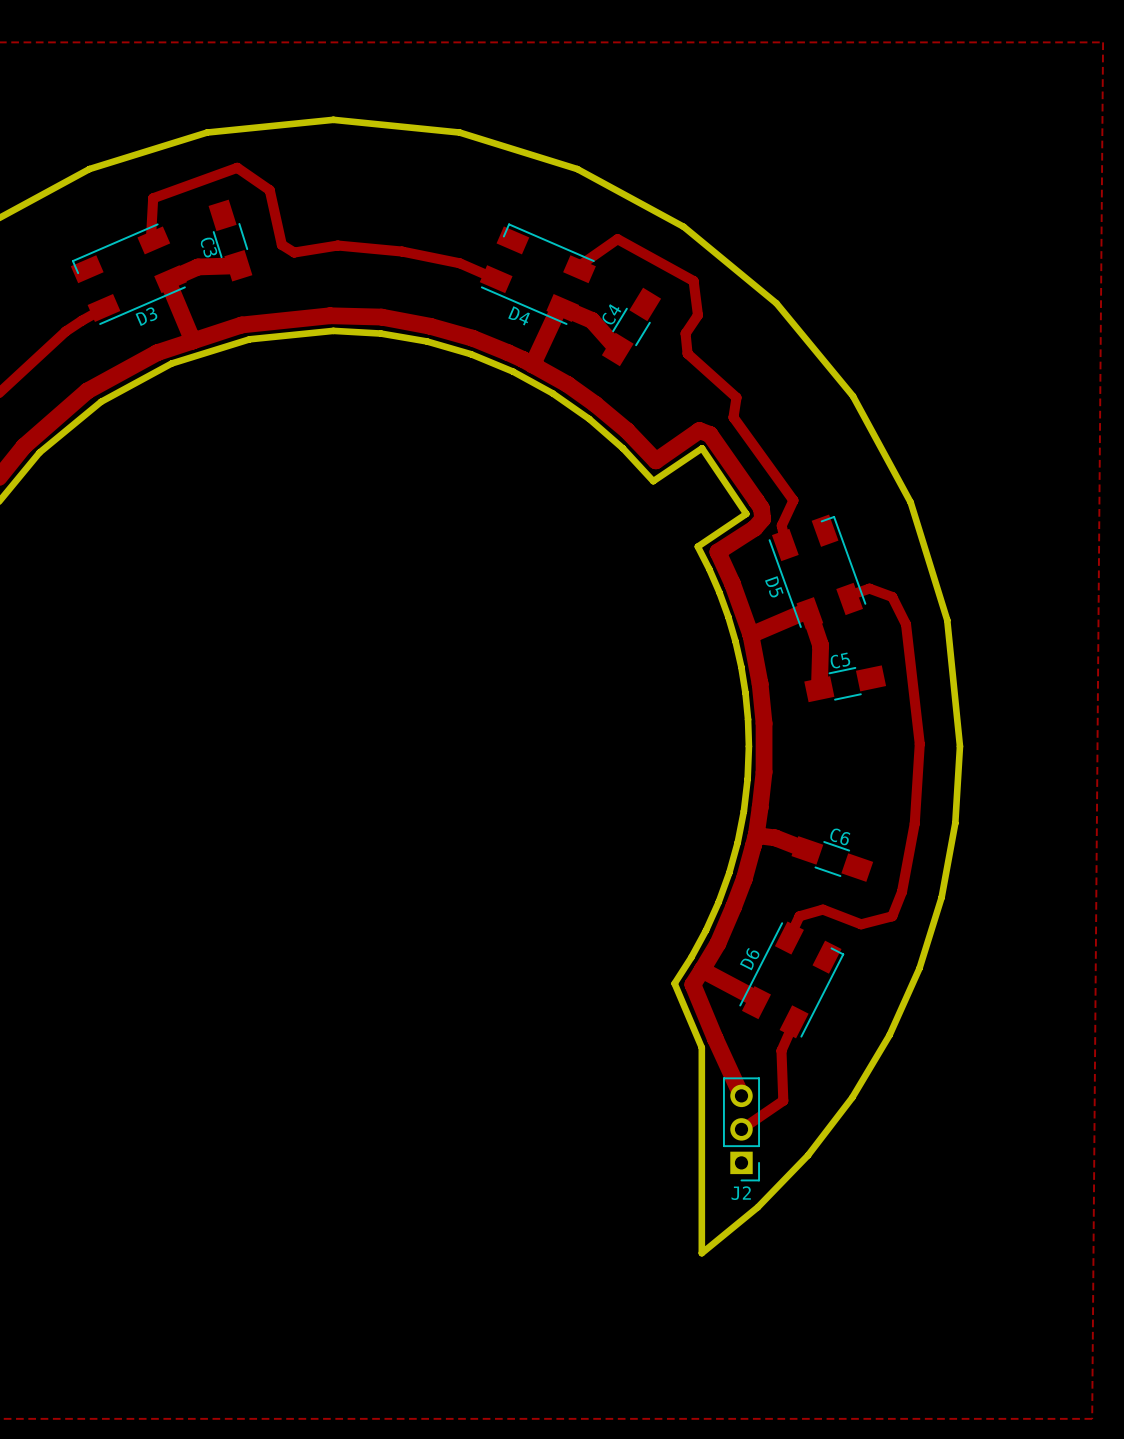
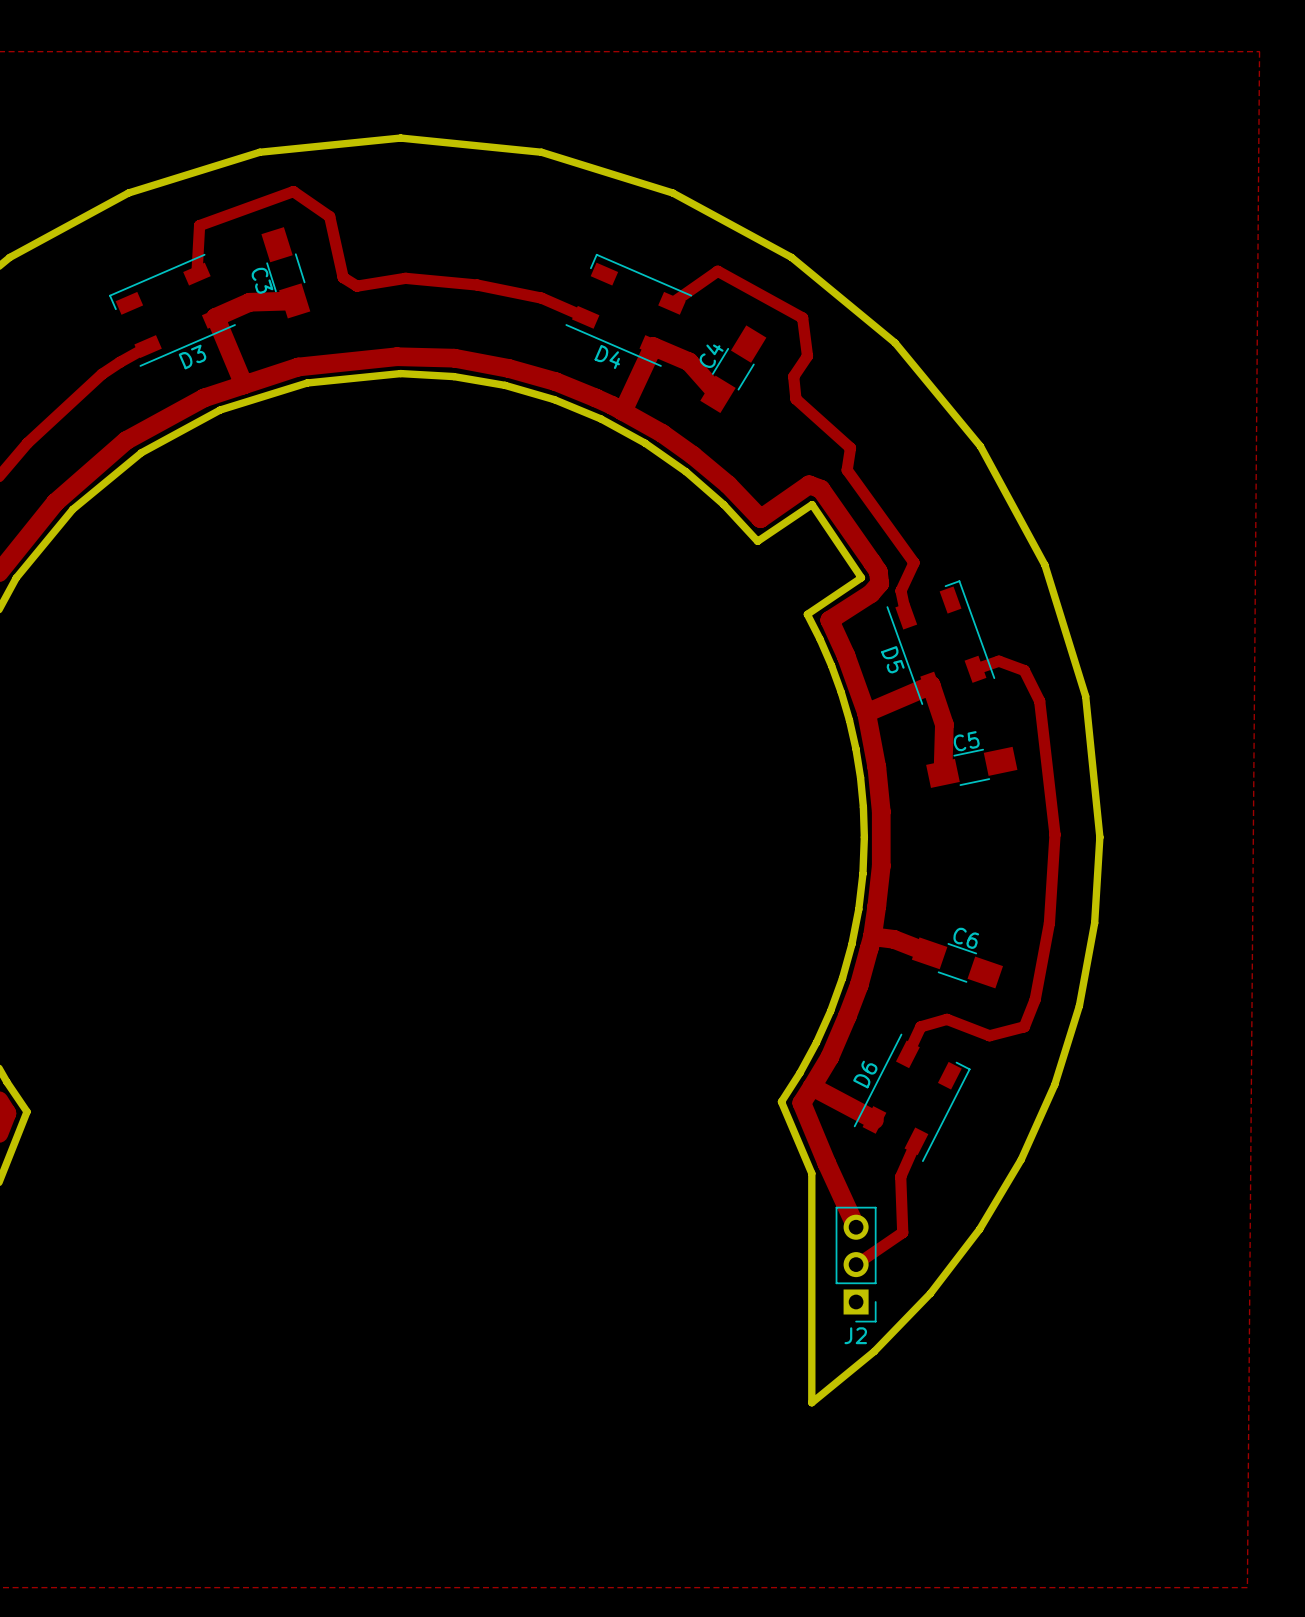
D3 footprint: [70, 223, 187, 325] -> [109, 253, 236, 367]
D4 footprint: [479, 223, 596, 325] -> [565, 253, 693, 367]
D5 footprint: [768, 514, 867, 630] -> [886, 580, 996, 705]
D6 footprint: [739, 921, 845, 1039] -> [853, 1033, 971, 1162]

